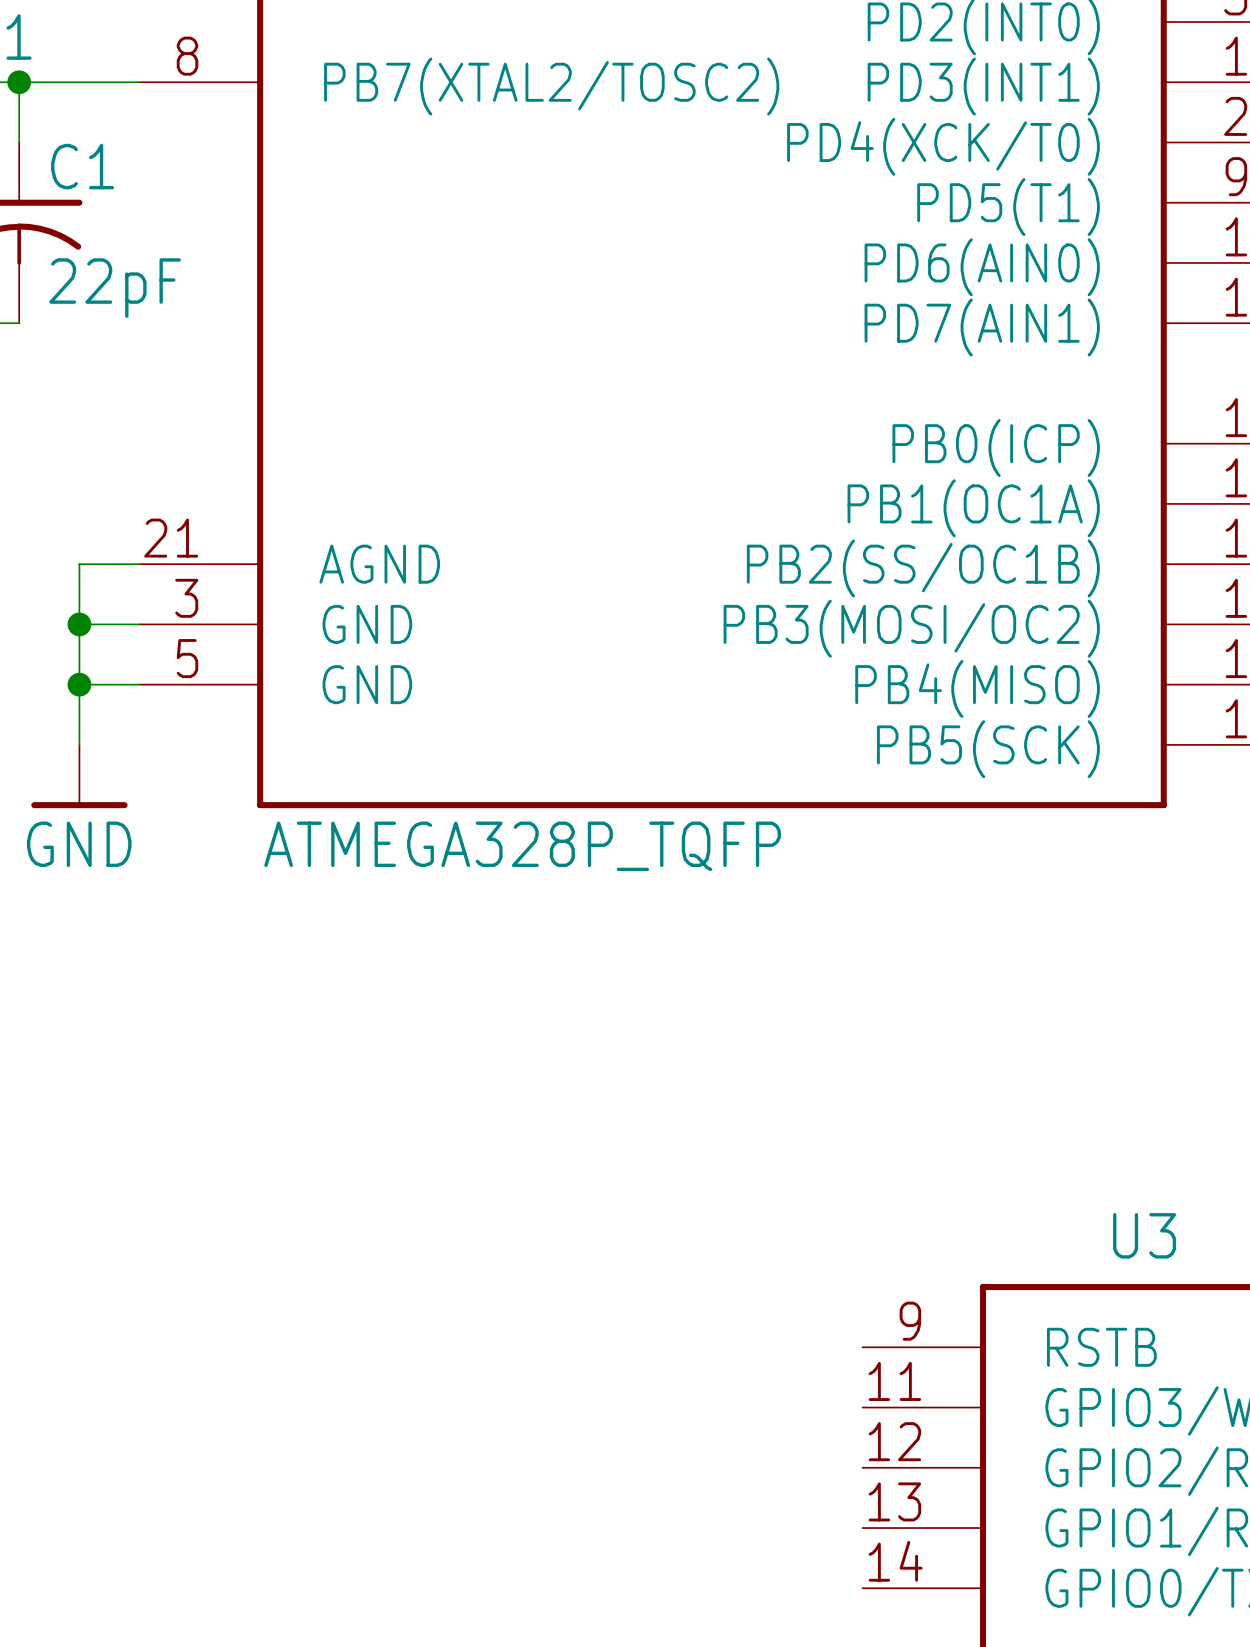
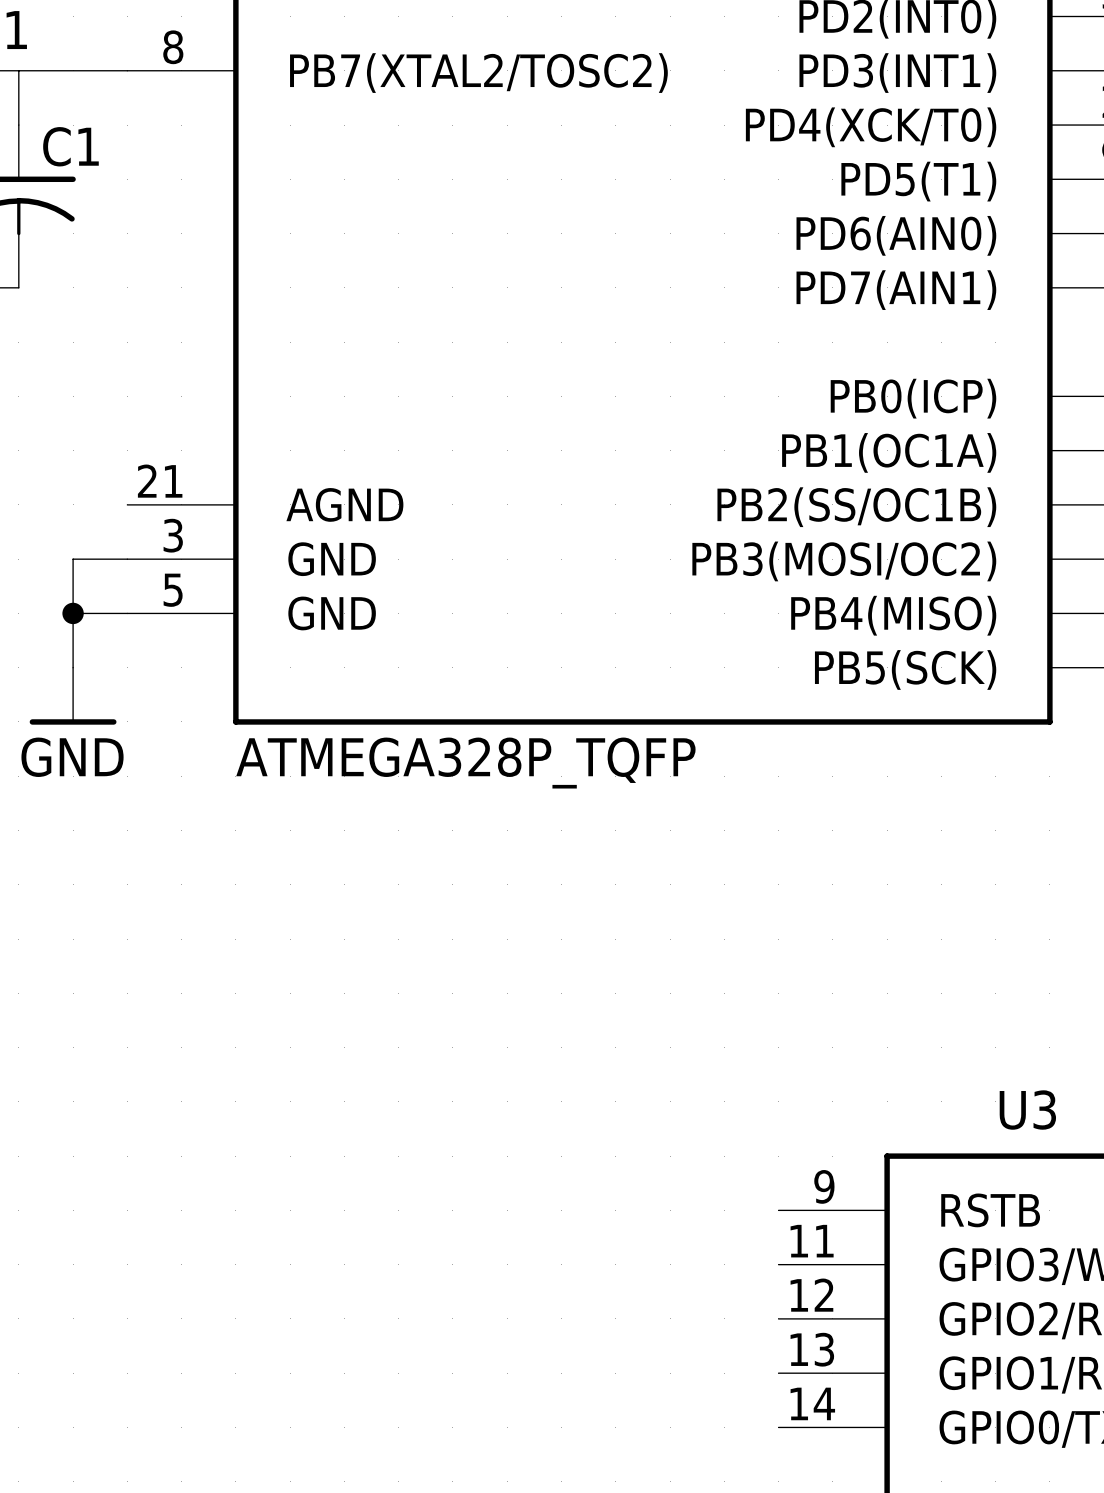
junction: (19, 82) -> none
C1 value: 22pF (115, 288) -> none
wire: (139, 564) (79, 564) (79, 624) -> none
junction: (79, 624) -> none

